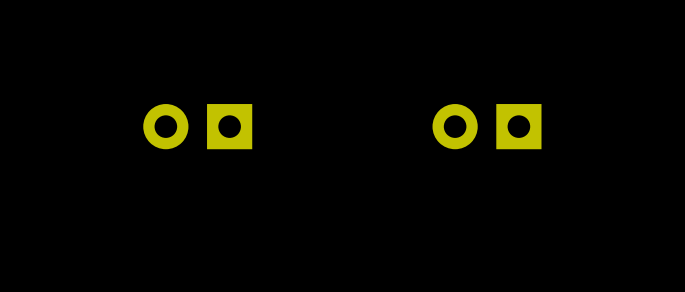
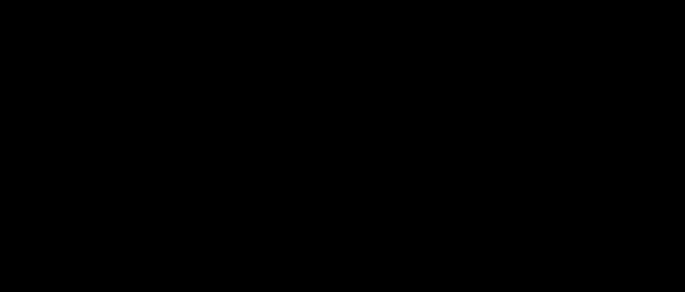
part: (197, 126) -> none
part: (487, 126) -> none

